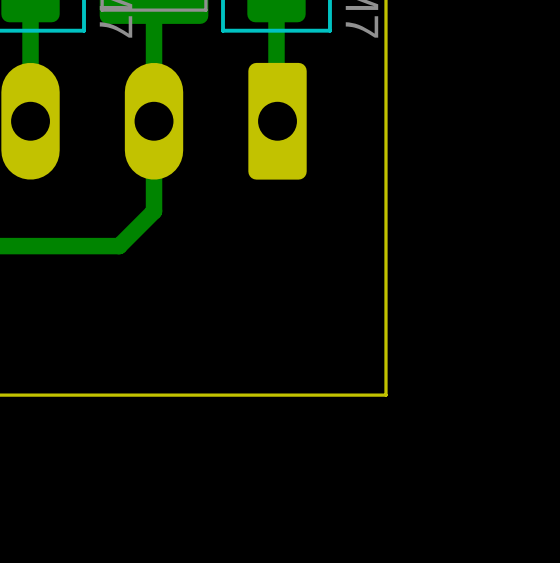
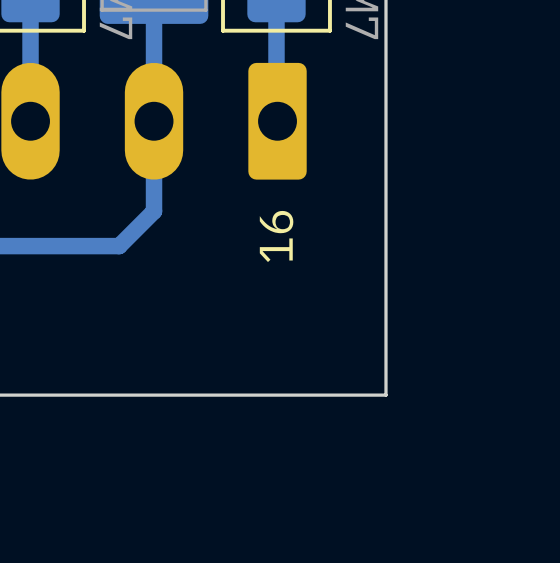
text: none -> 16 (276, 236)

